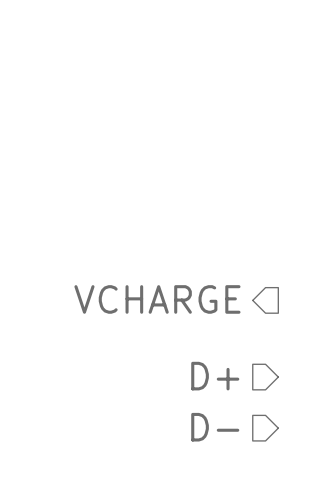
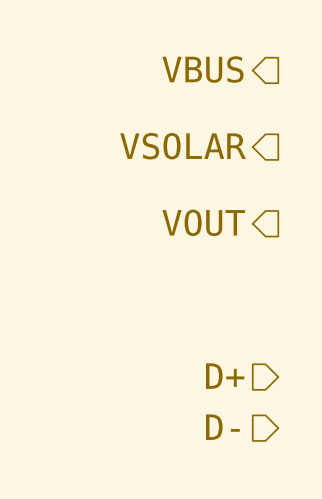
hierarchical label: none -> VBUS (203, 69)
hierarchical label: none -> VSOLAR (183, 146)
hierarchical label: none -> VOUT (203, 222)
hierarchical label: VCHARGE (157, 299) -> none

